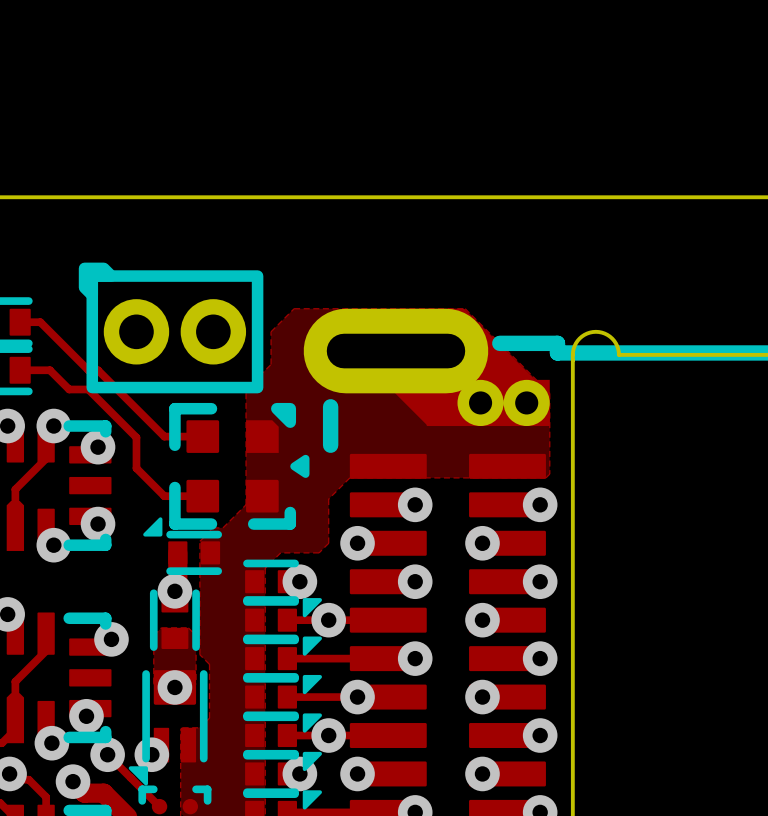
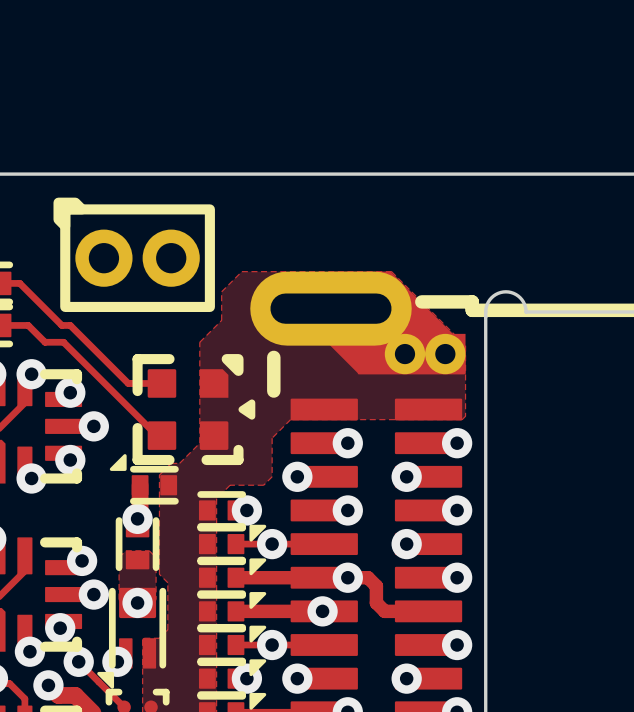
part position: (171, 327) -> (134, 254)
track: (88, 389) (136, 437) (136, 468) (164, 496) (197, 496) -> (61, 342) (156, 435)
via: none -> (93, 426)
track width: thin (287, 658) (388, 658) -> thick (235, 577) (324, 577)
track: none -> (324, 577) (367, 577) (376, 586) (376, 602) (384, 611) (428, 611)
via: none -> (93, 594)
track width: thin (287, 697) (367, 697) -> thick (235, 611) (305, 611)
via position: (357, 697) -> (322, 611)
via: (482, 697) -> none

